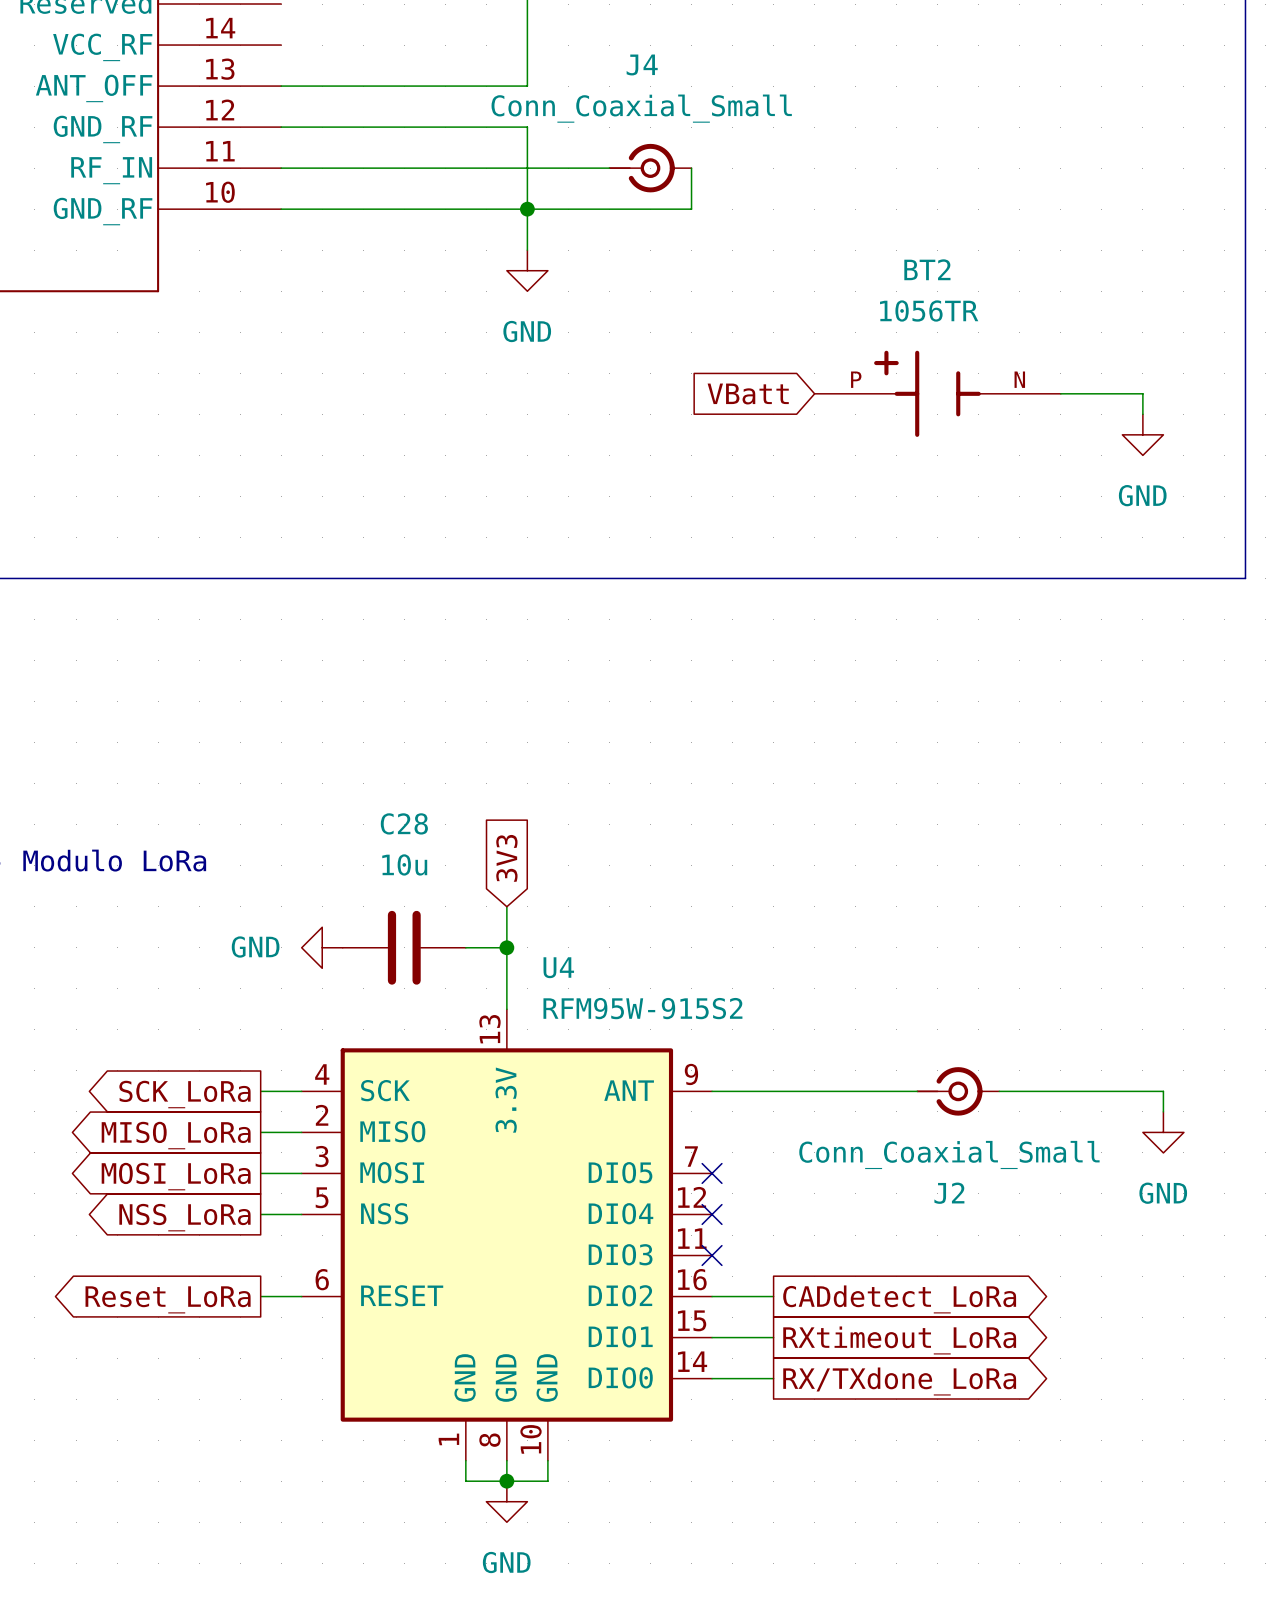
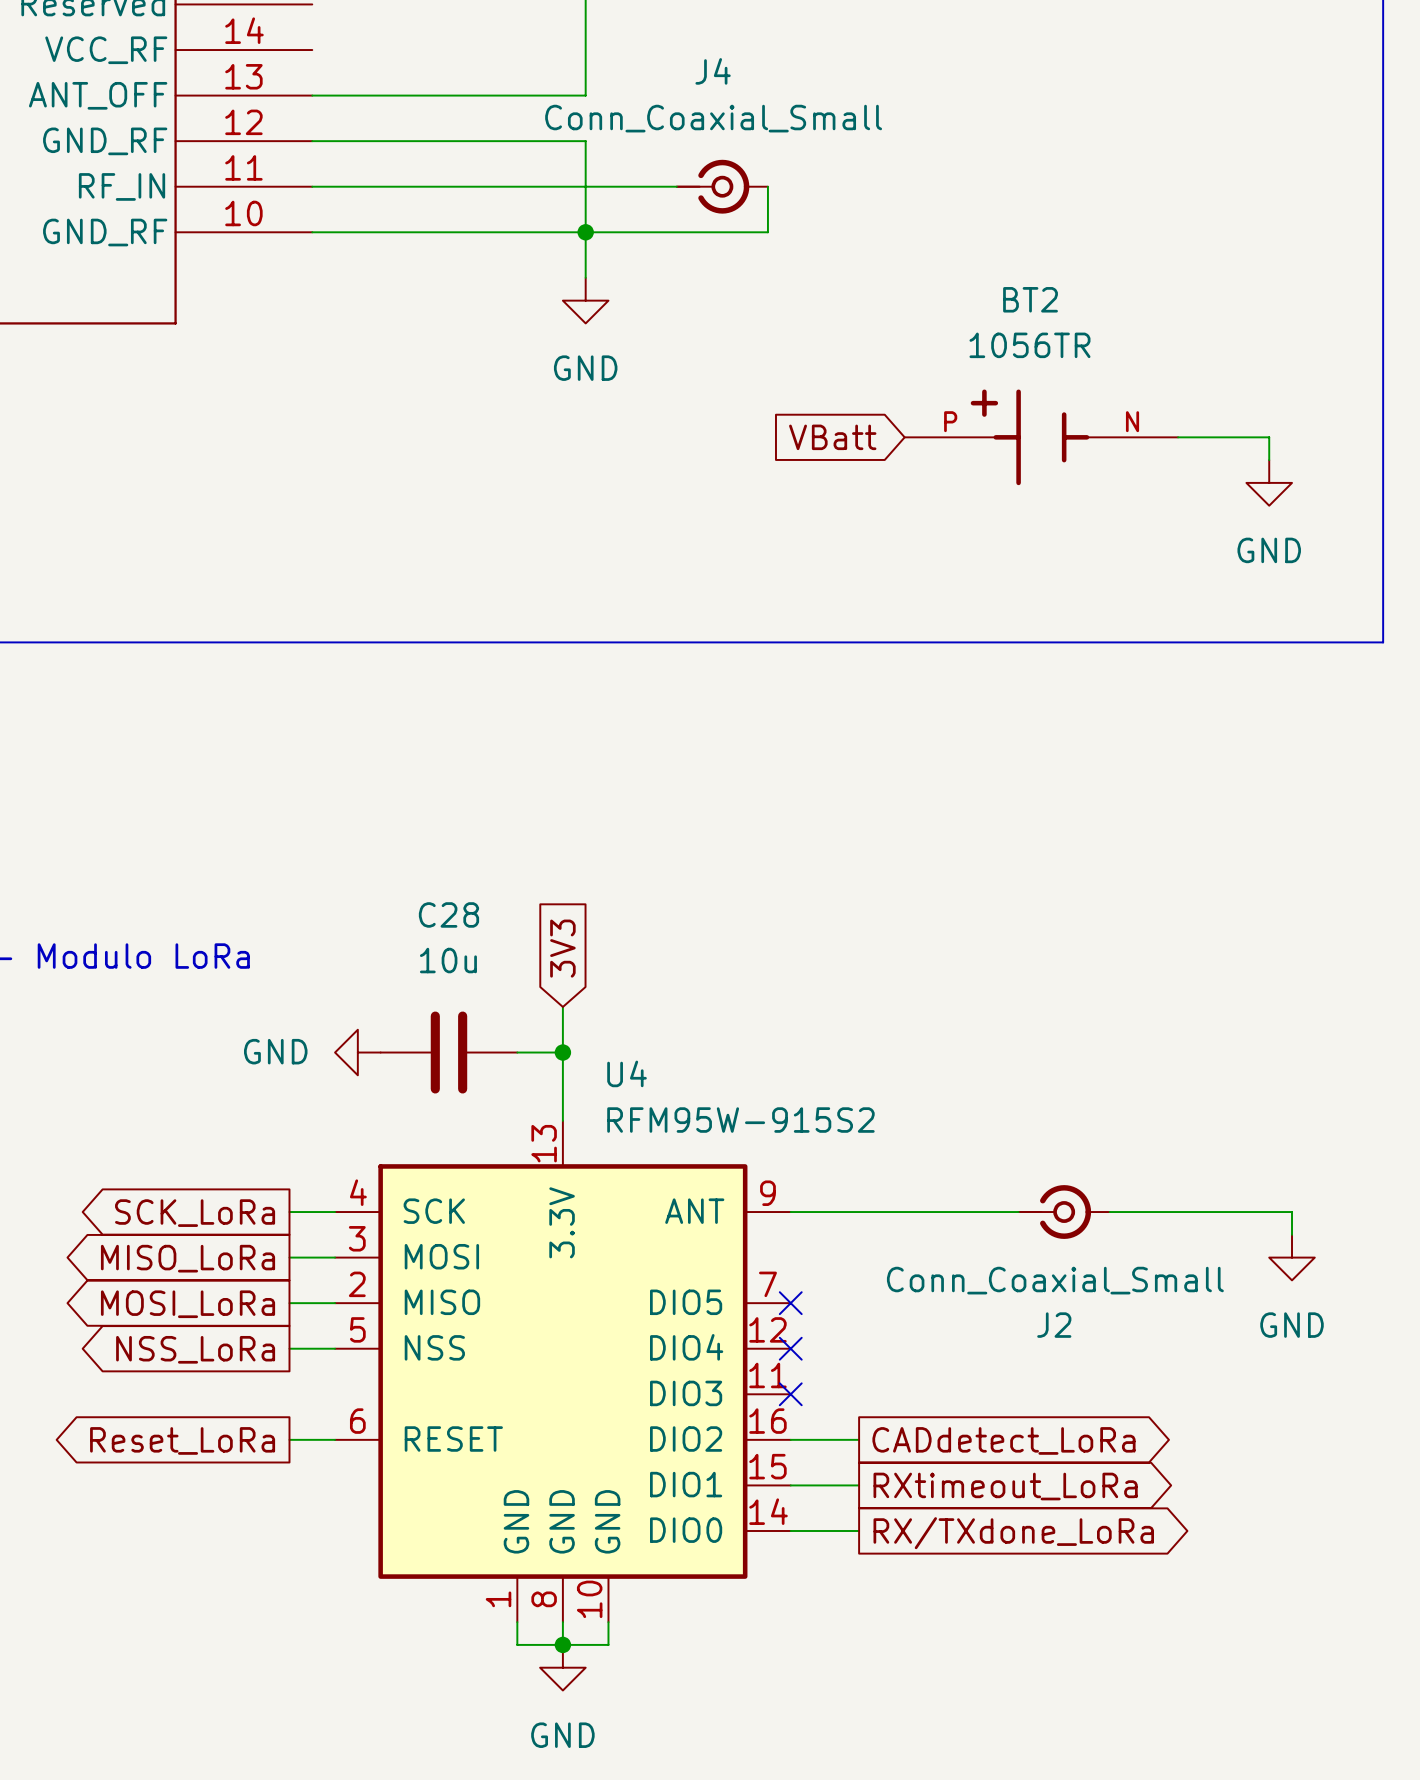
U4 pin number: 2 (322, 1115) -> 3 (357, 1238)
U4 pin name: MISO (392, 1131) -> MOSI (441, 1256)
U4 pin number: 3 (322, 1156) -> 2 (357, 1284)
U4 pin name: MOSI (392, 1172) -> MISO (442, 1302)

